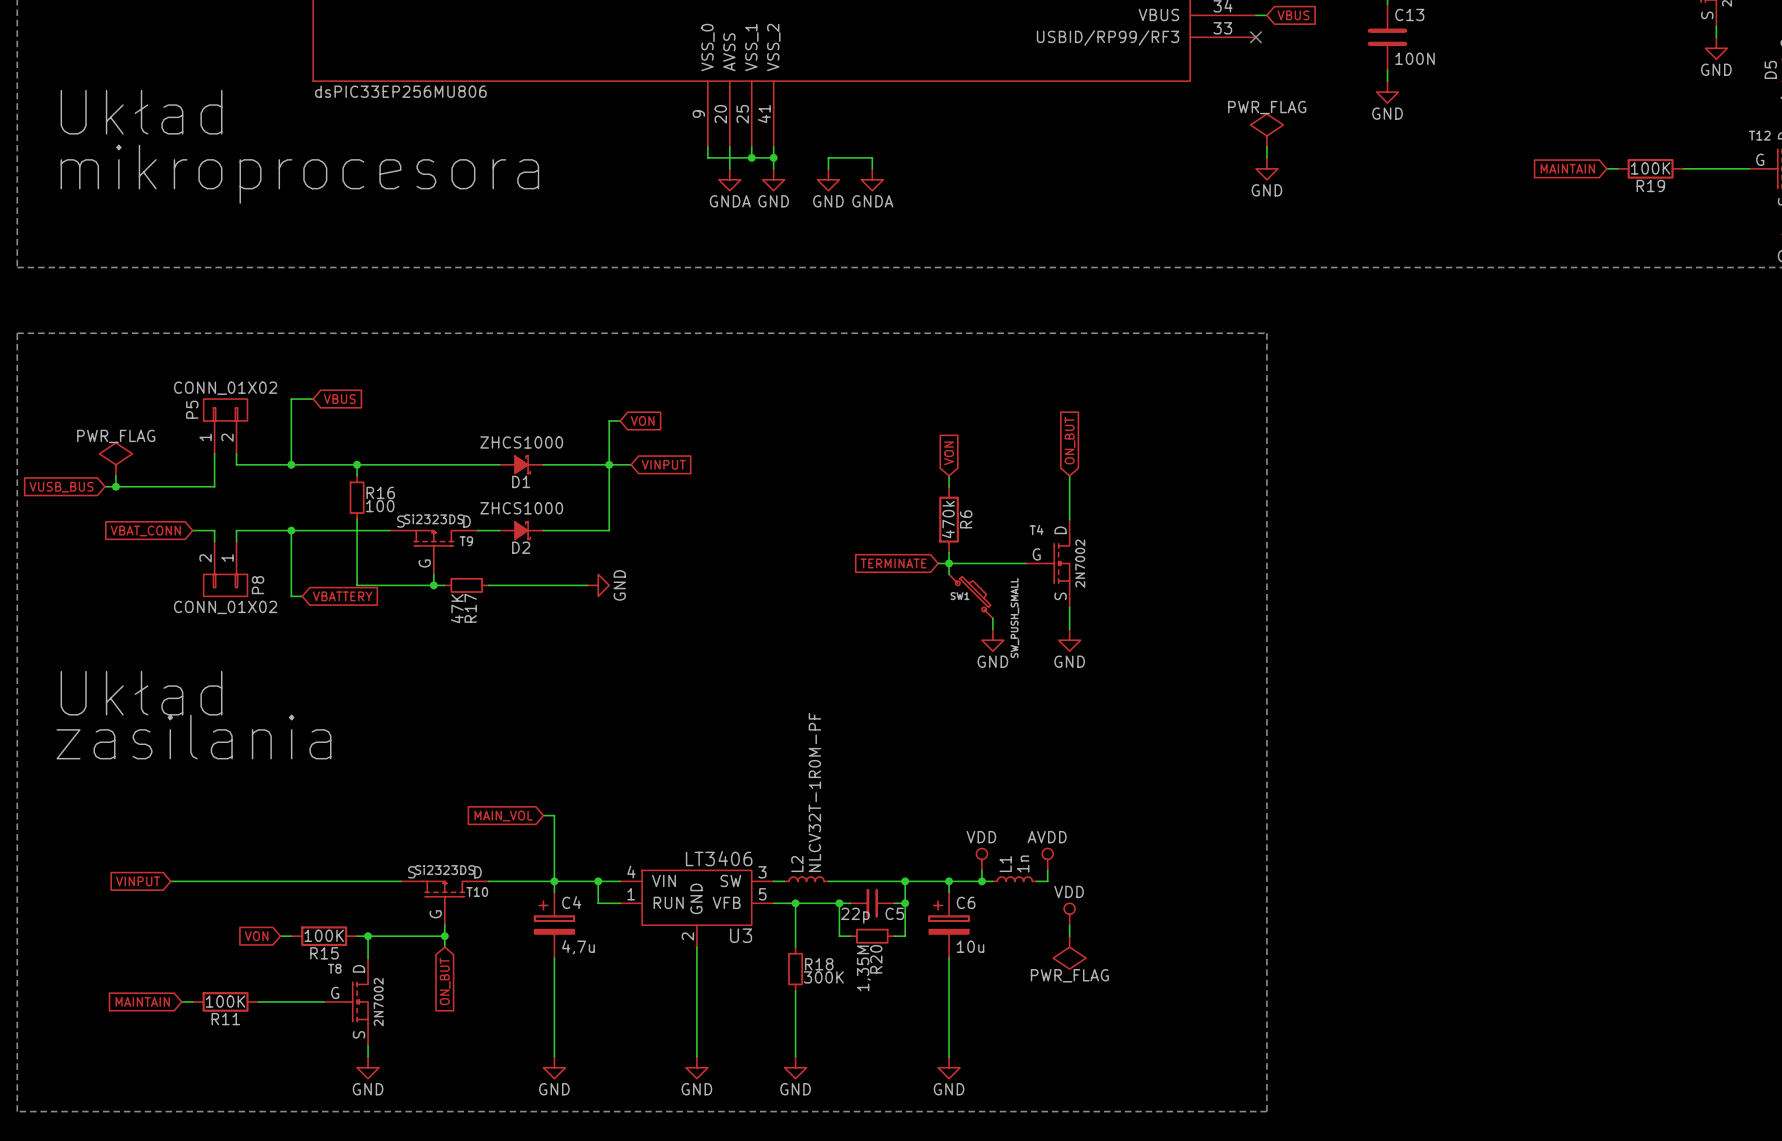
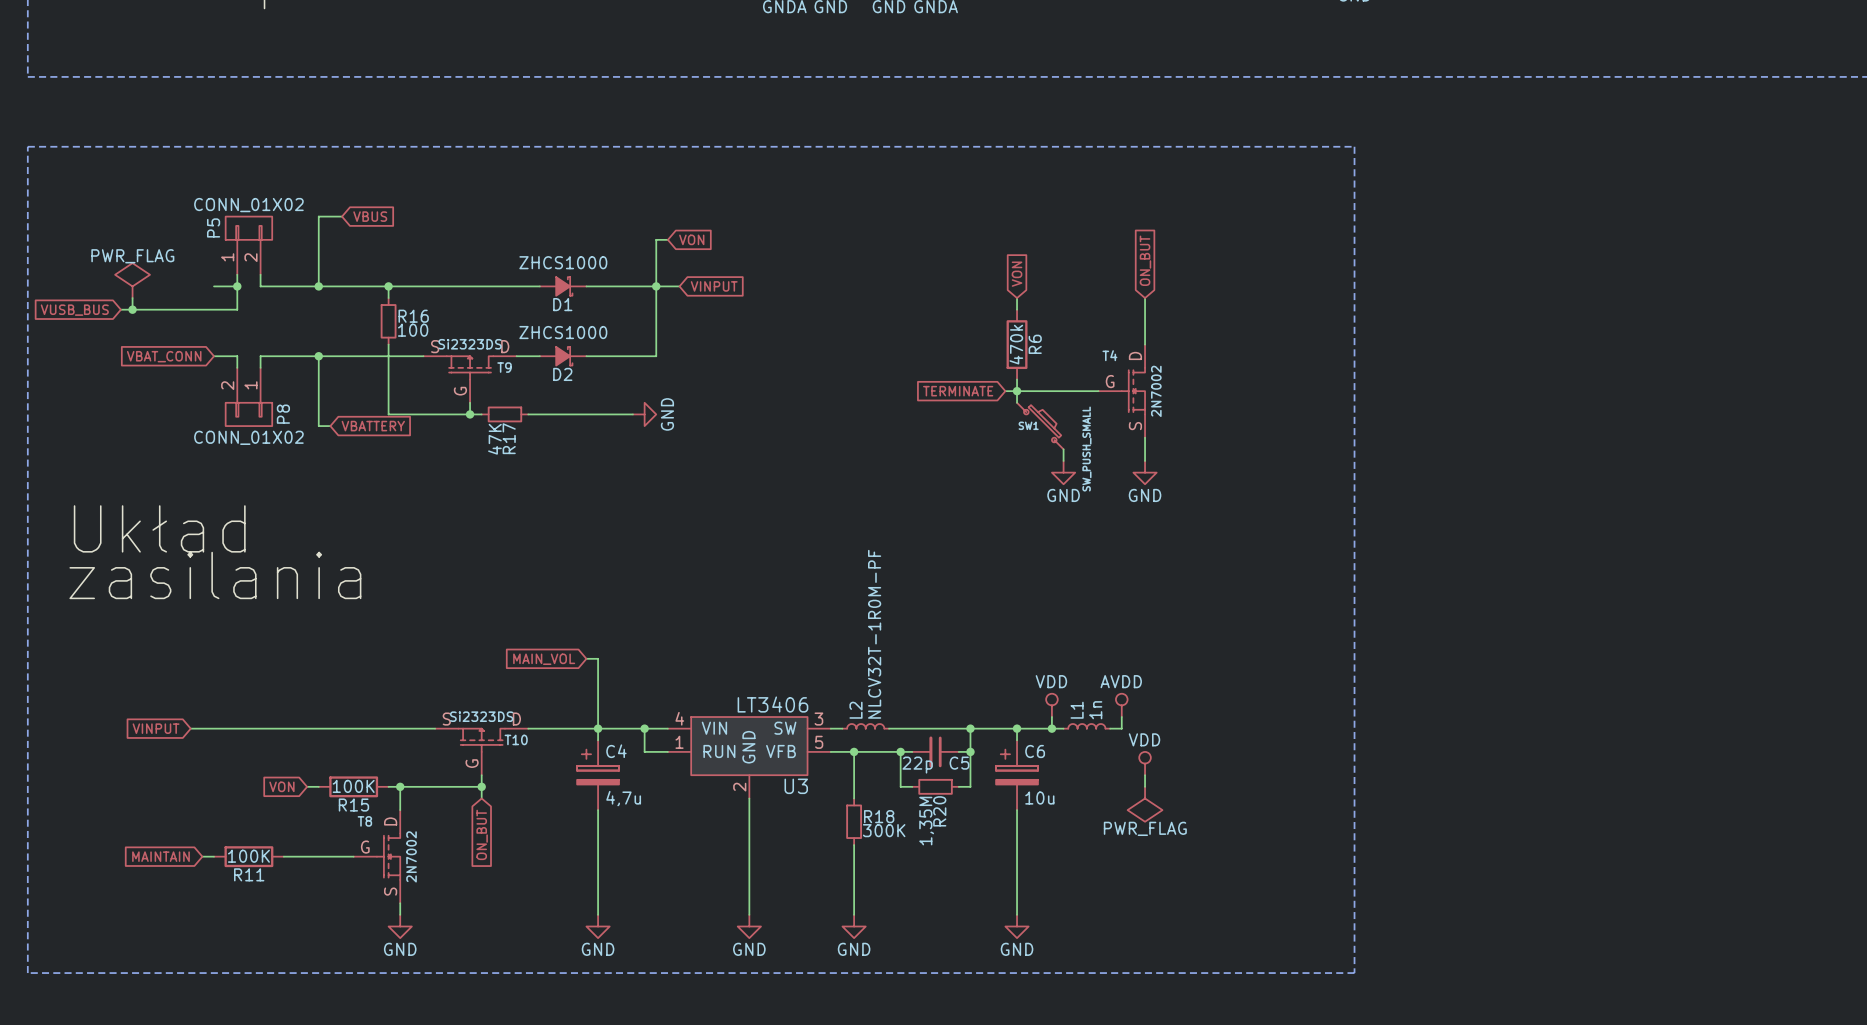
wire: none -> (214, 286) (237, 286)
junction: none -> (237, 286)

